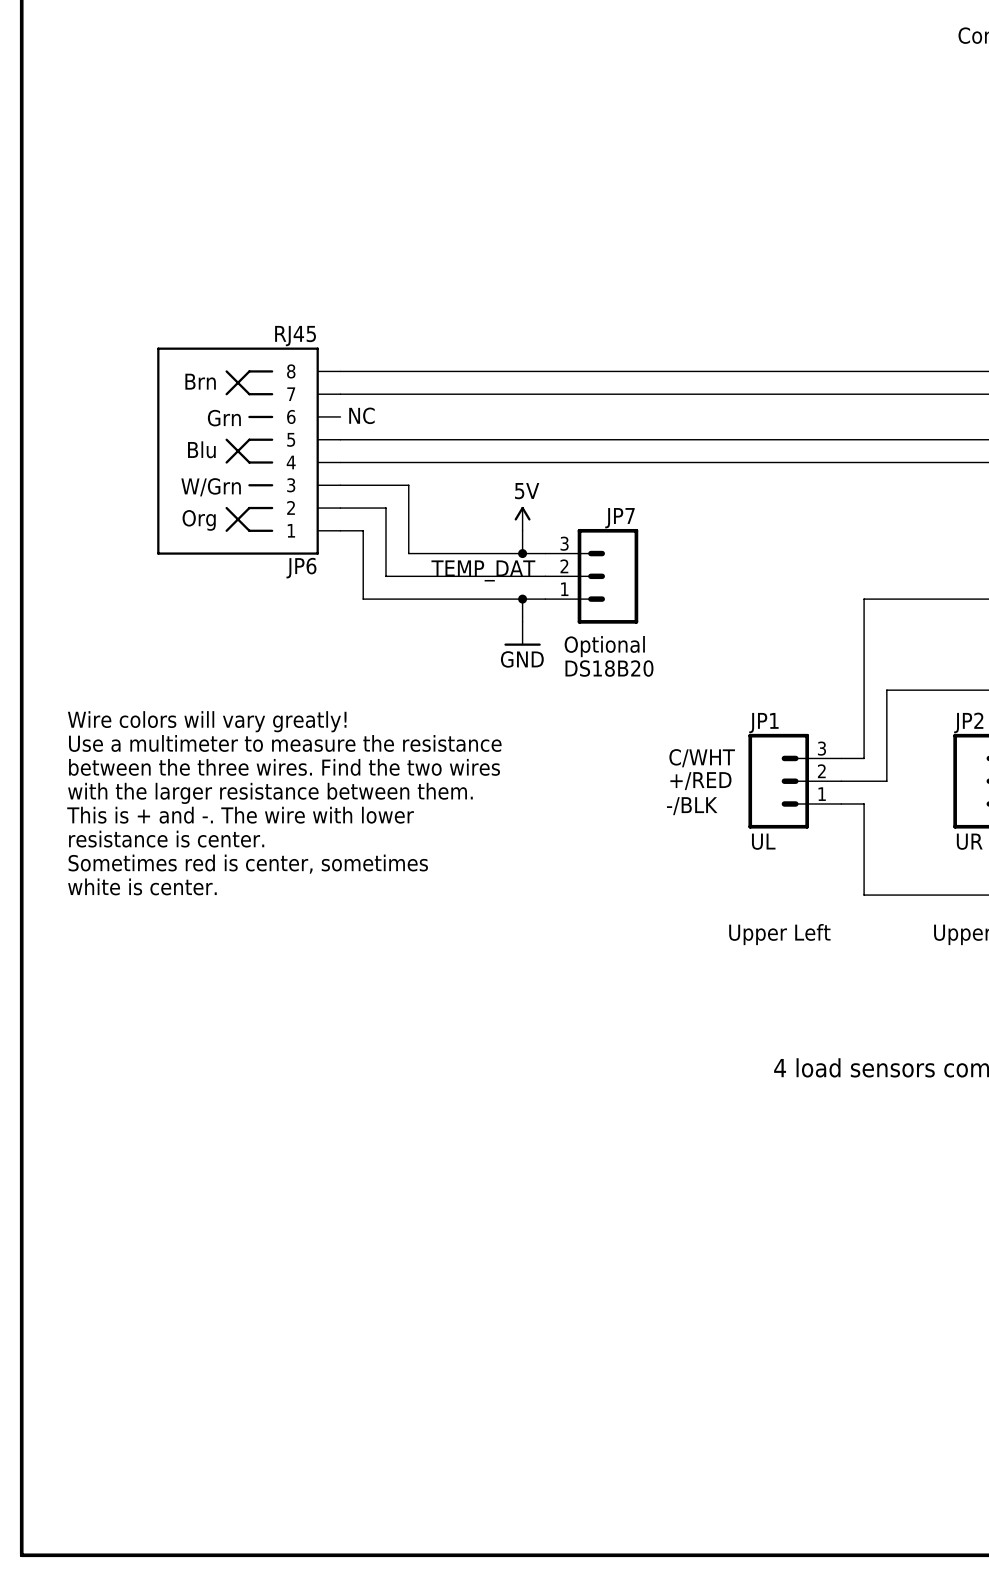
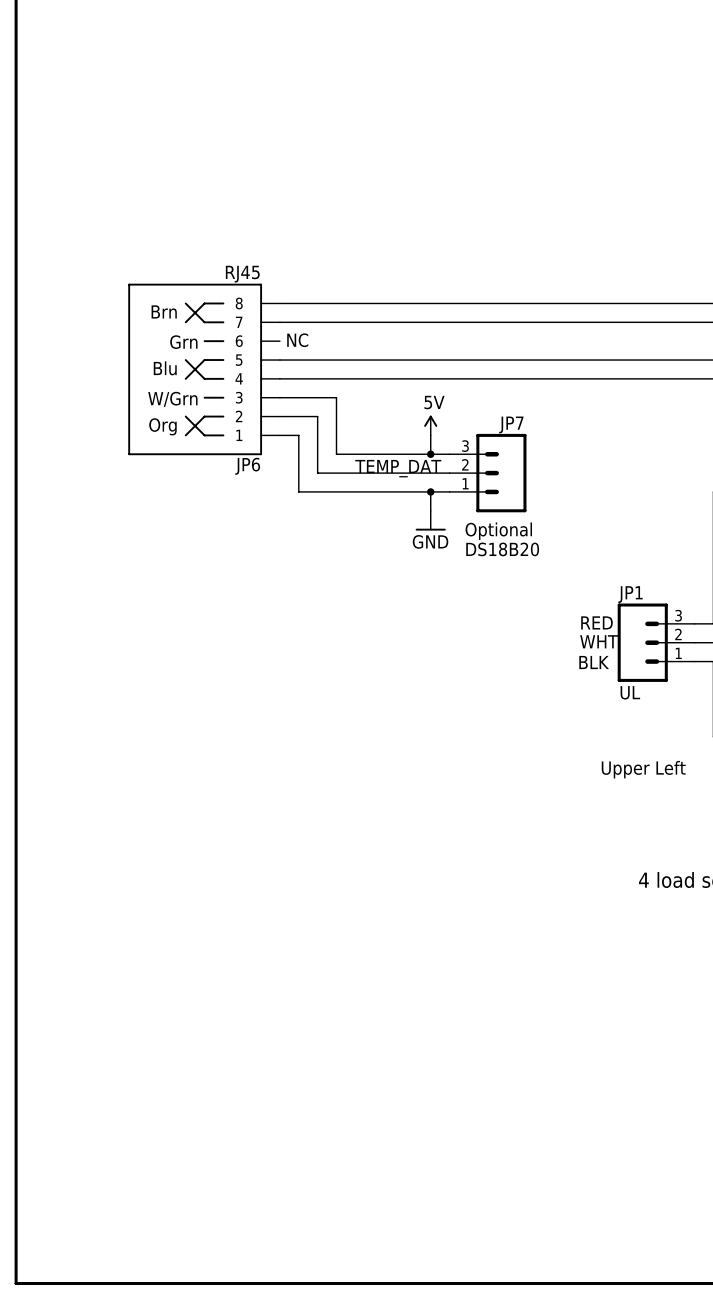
text: Wire colors will vary greatly! (207, 721) -> none
text: Use a multimeter to measure the resistance (285, 743) -> none
text: C/WHT (702, 758) -> WHT (599, 641)
text: between the three wires. Find the two wires (284, 767) -> none
text: +/RED (700, 781) -> RED (597, 622)
text: with the larger resistance between them. (270, 793) -> none
text: -/BLK (692, 806) -> BLK (594, 662)
text: This is + and -. The wire with lower (240, 815) -> none
text: resistance is center. (166, 839) -> none
text: Sometimes red is center, sometimes (248, 864) -> none
text: white is center. (142, 886) -> none

